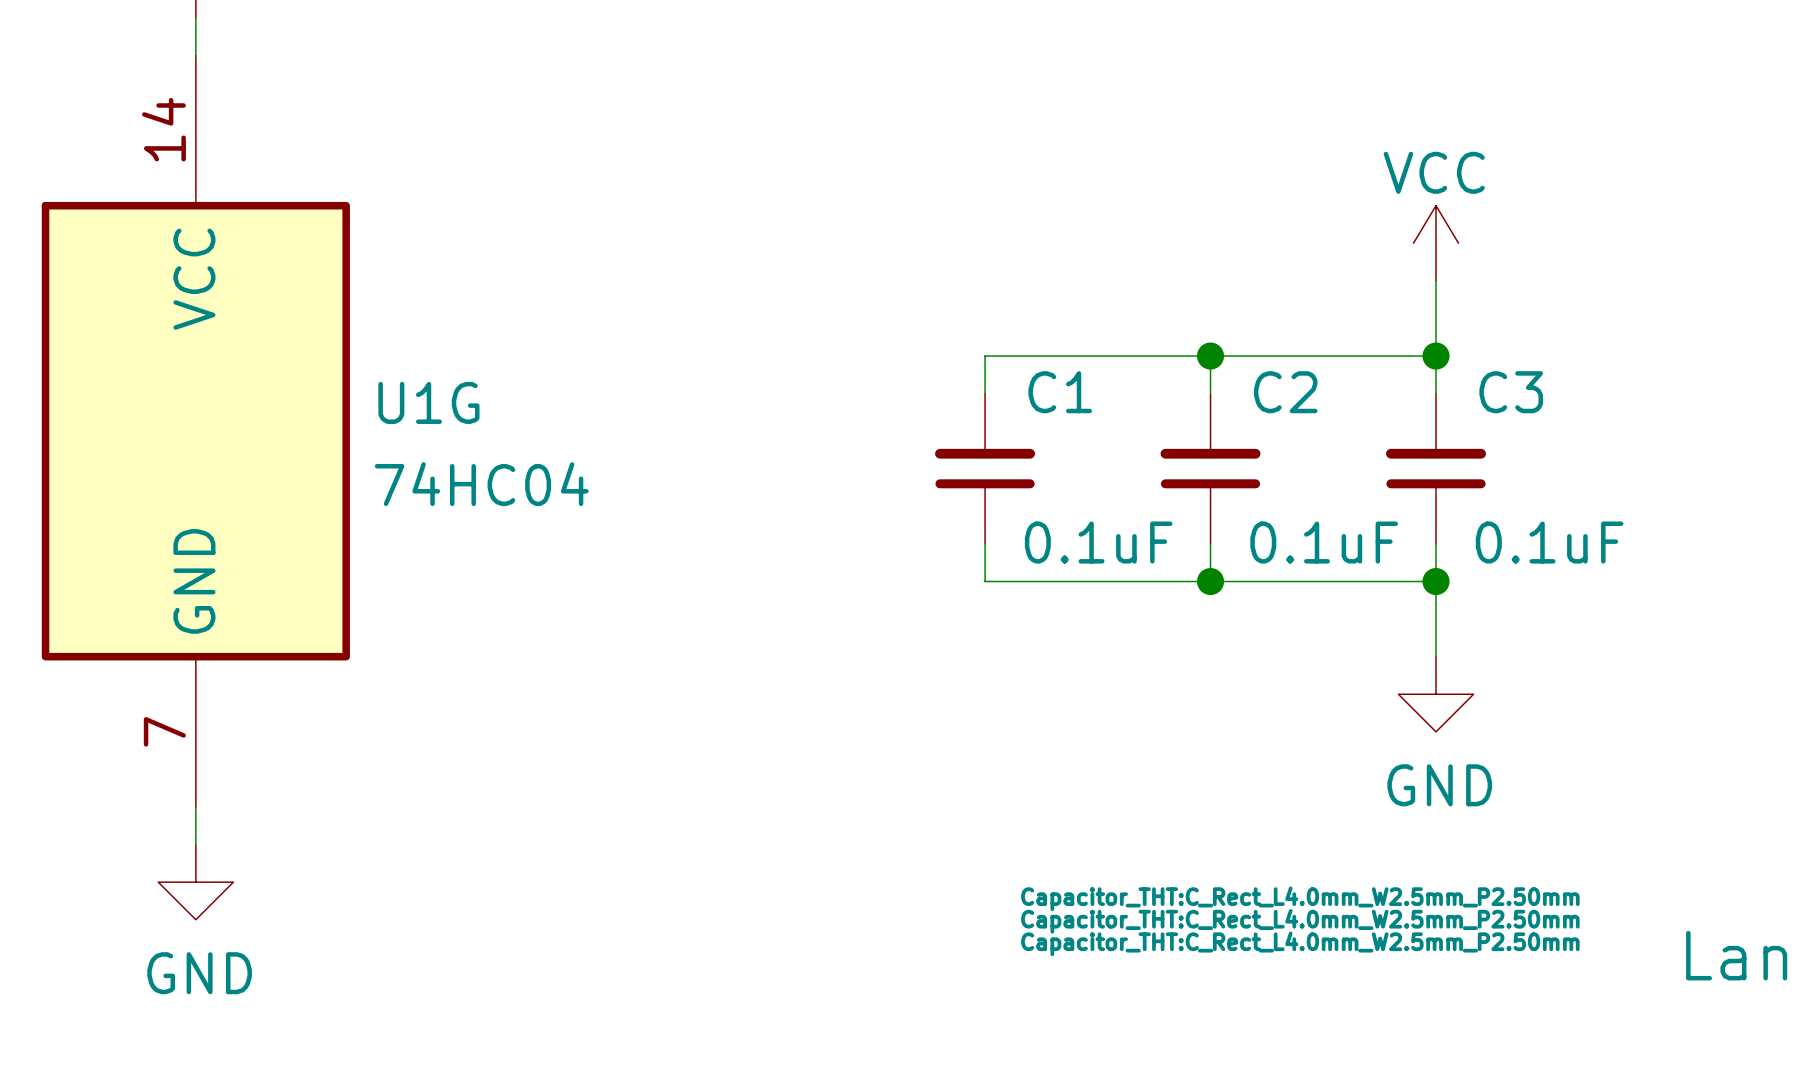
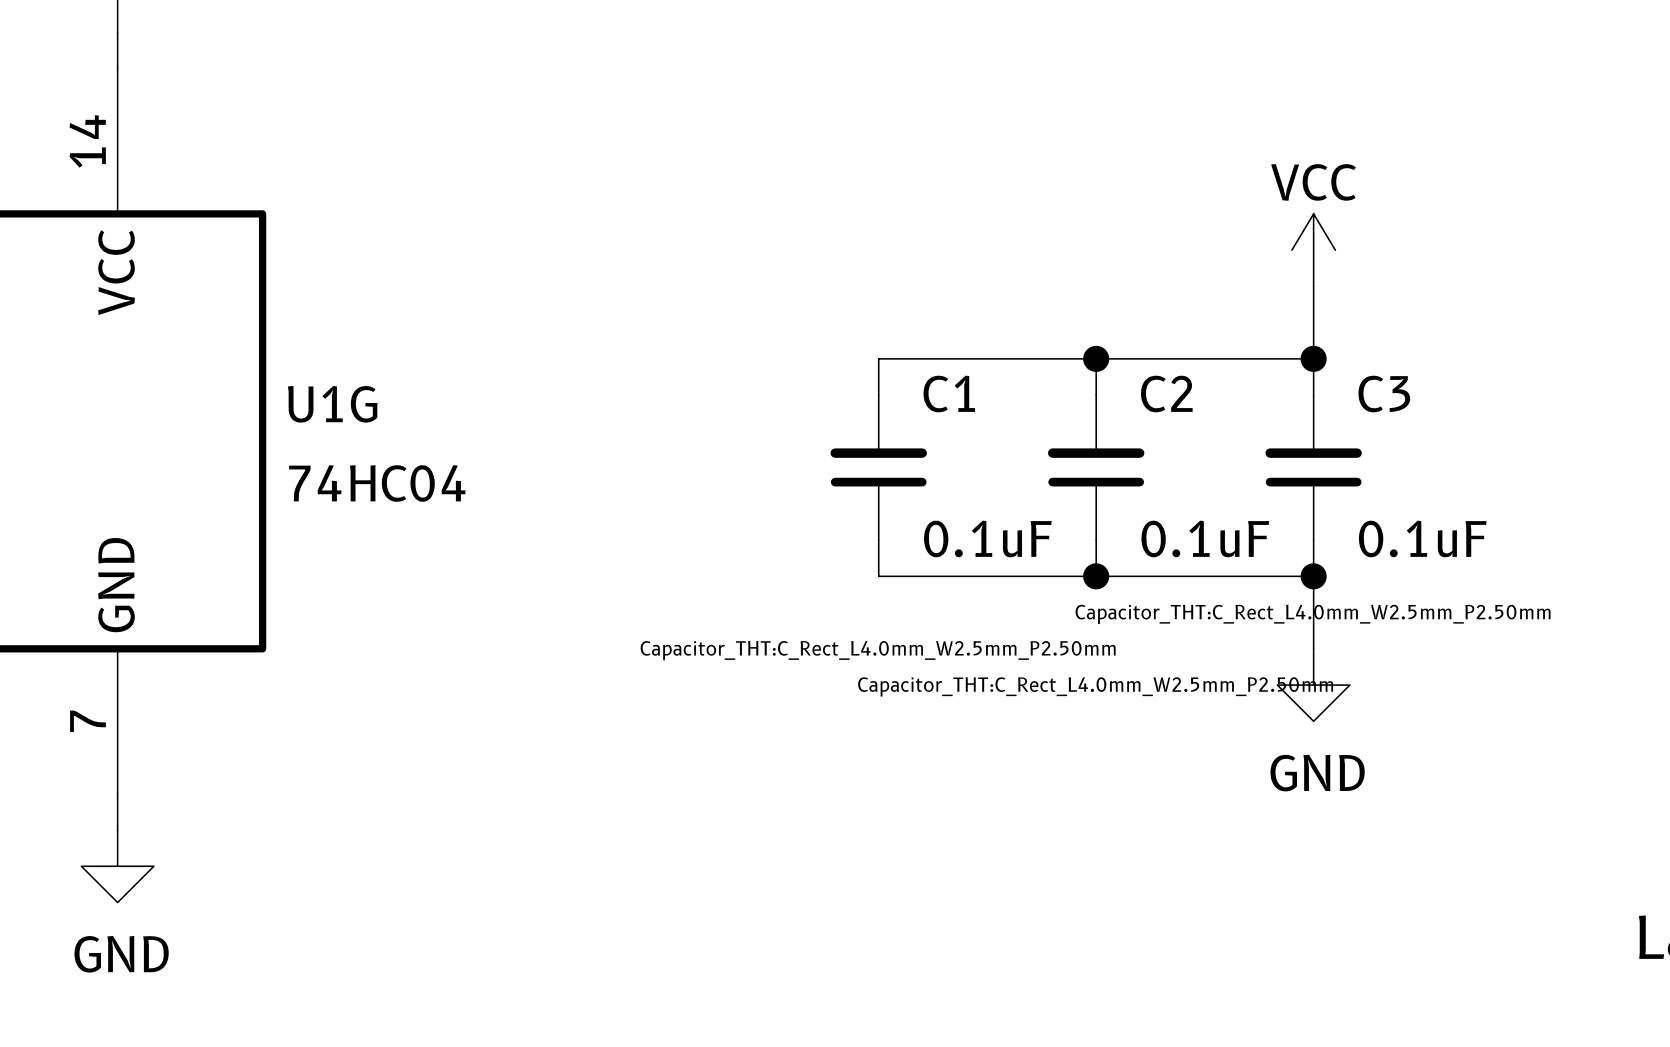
C3 text position: Capacitor_THT:C_Rect_L4.0mm_W2.5mm_P2.50mm (1300, 898) -> Capacitor_THT:C_Rect_L4.0mm_W2.5mm_P2.50mm (1313, 614)
C2 text position: Capacitor_THT:C_Rect_L4.0mm_W2.5mm_P2.50mm (1300, 921) -> Capacitor_THT:C_Rect_L4.0mm_W2.5mm_P2.50mm (1095, 686)
C1 text position: Capacitor_THT:C_Rect_L4.0mm_W2.5mm_P2.50mm (1300, 943) -> Capacitor_THT:C_Rect_L4.0mm_W2.5mm_P2.50mm (878, 650)

